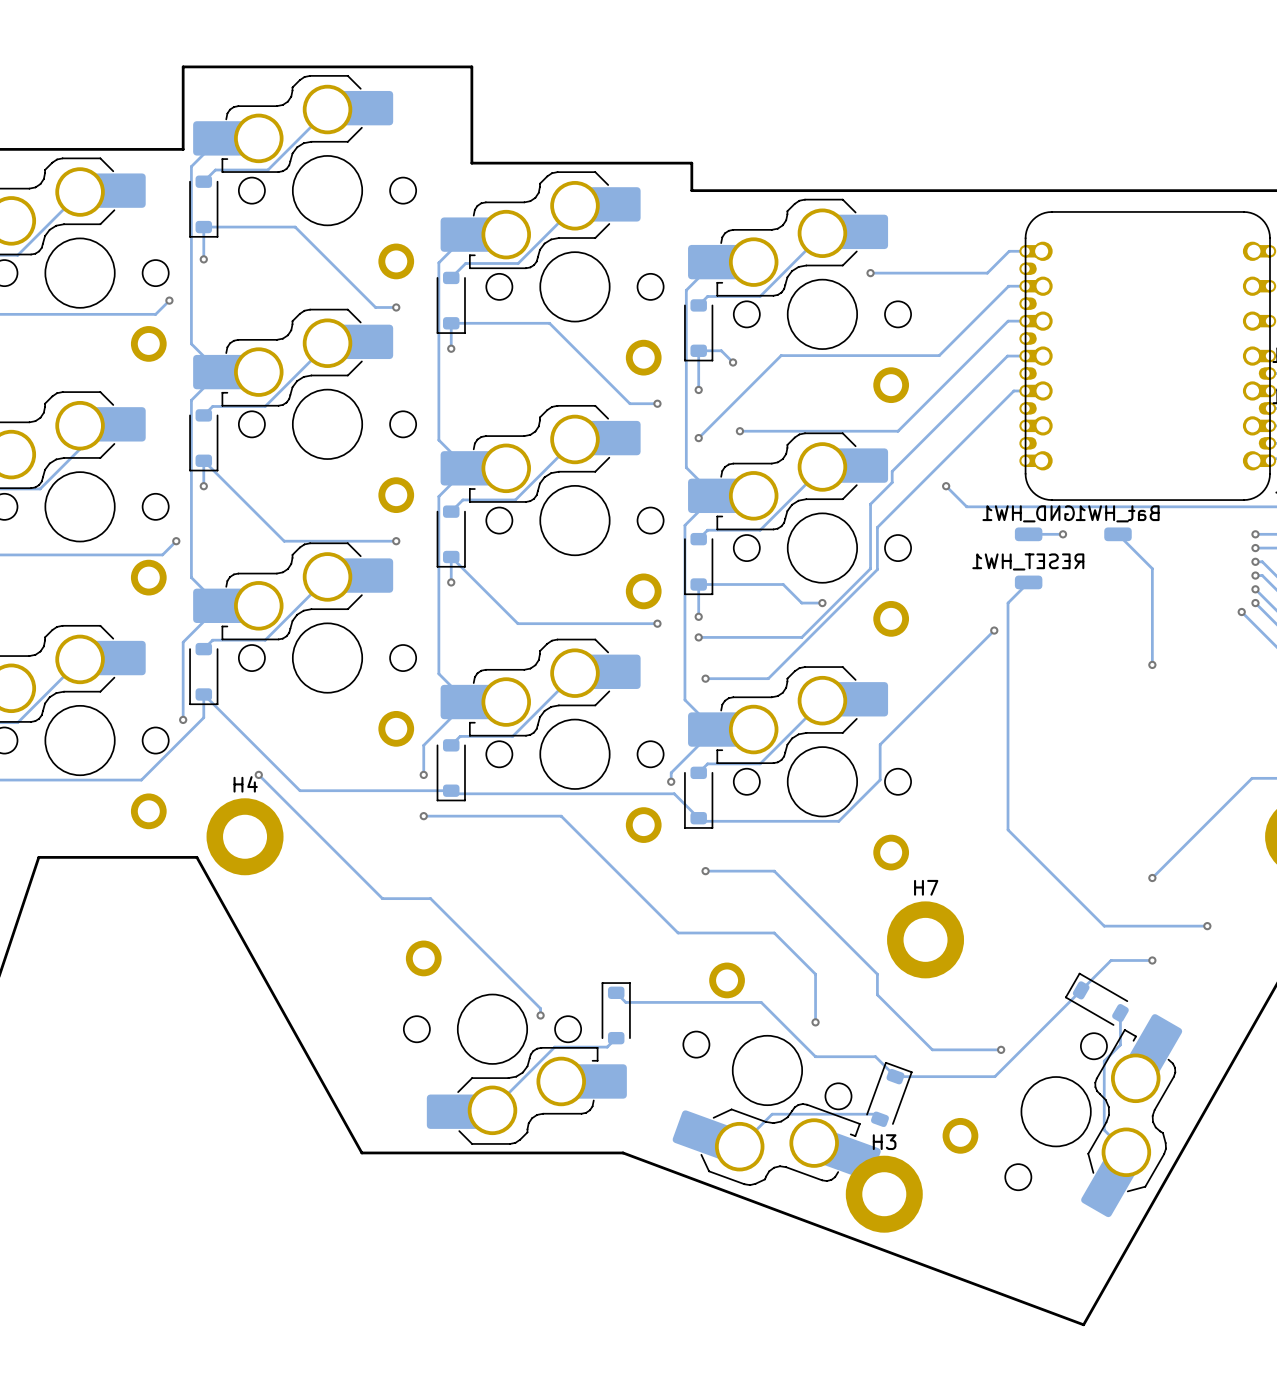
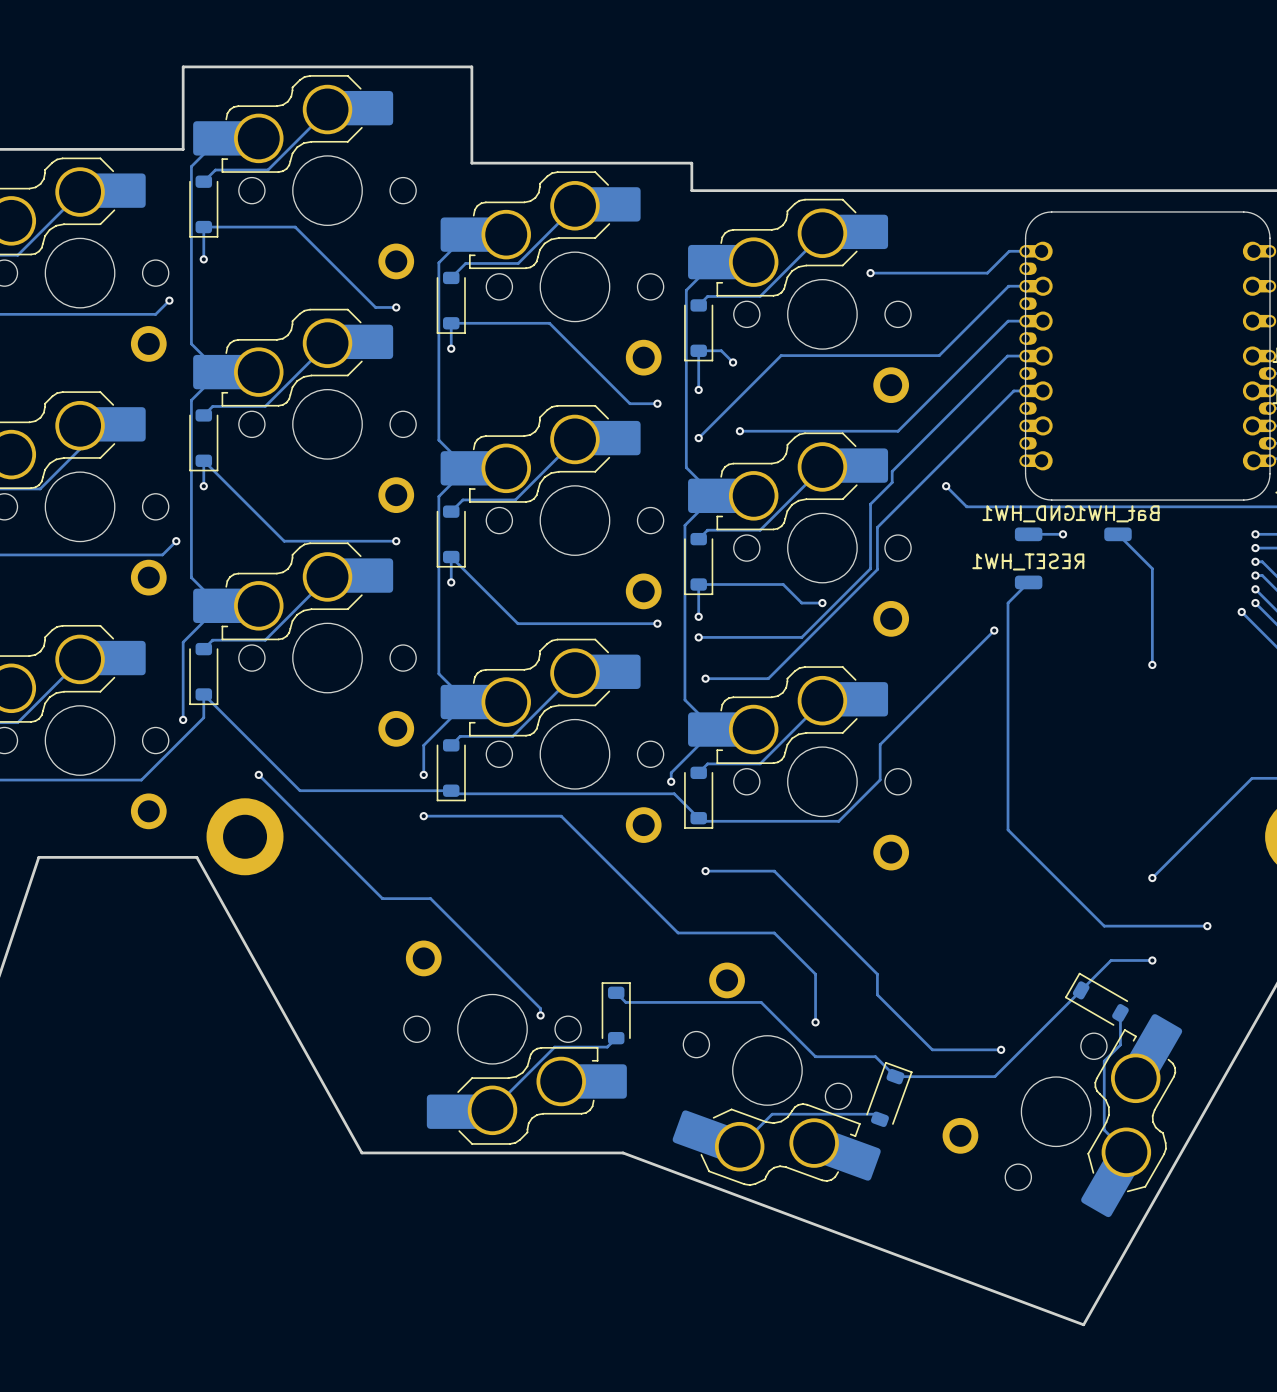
H4 name: H4 (245, 784) -> none
H7: (925, 939) -> none
H3: (884, 1194) -> none

